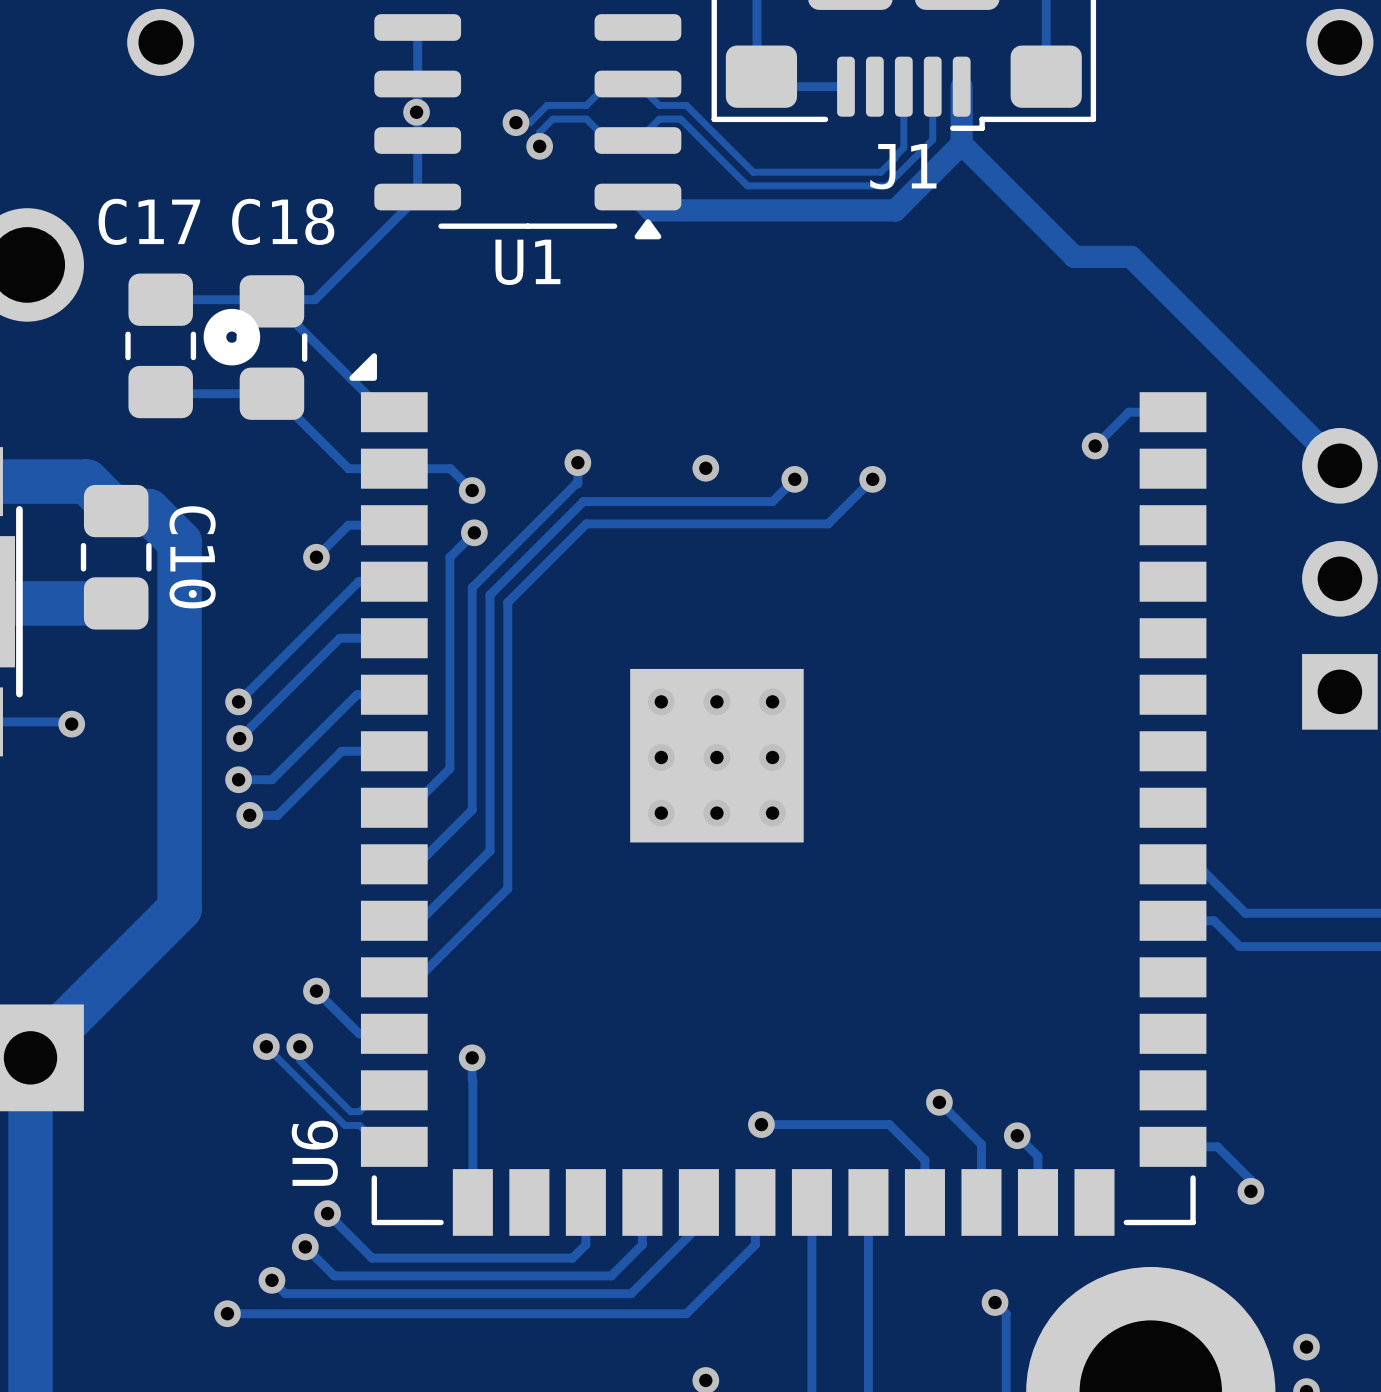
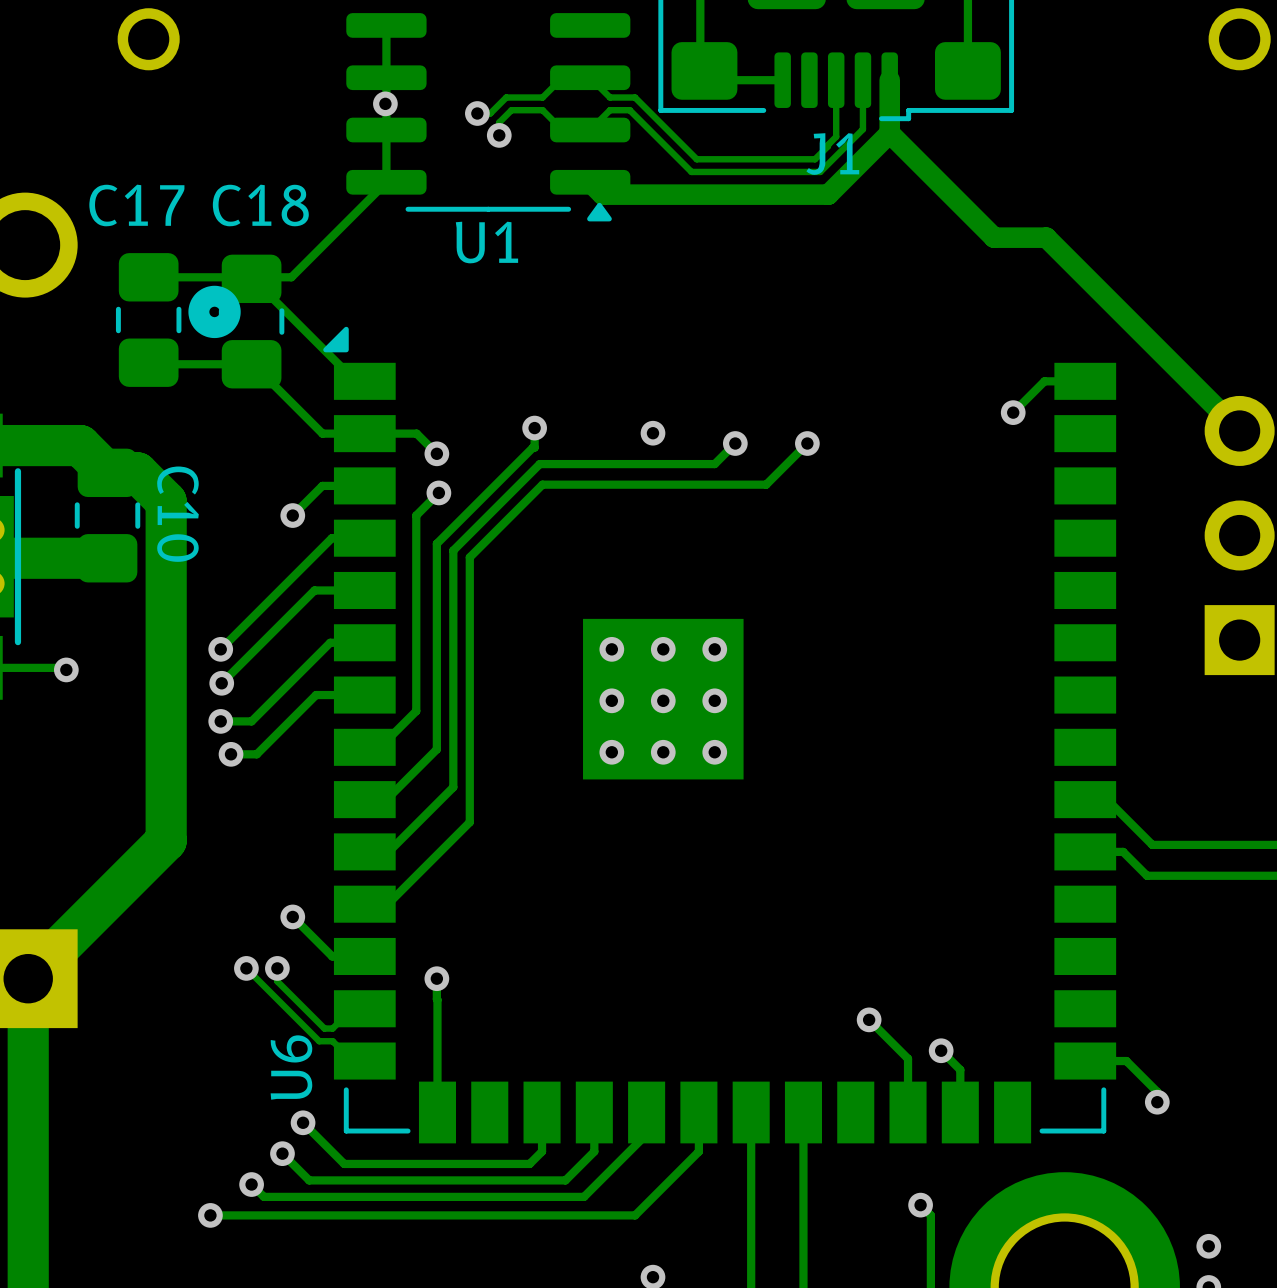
track: (761, 1124) (889, 1124) (924, 1160) (924, 1202) -> none
via: (761, 1124) -> none

